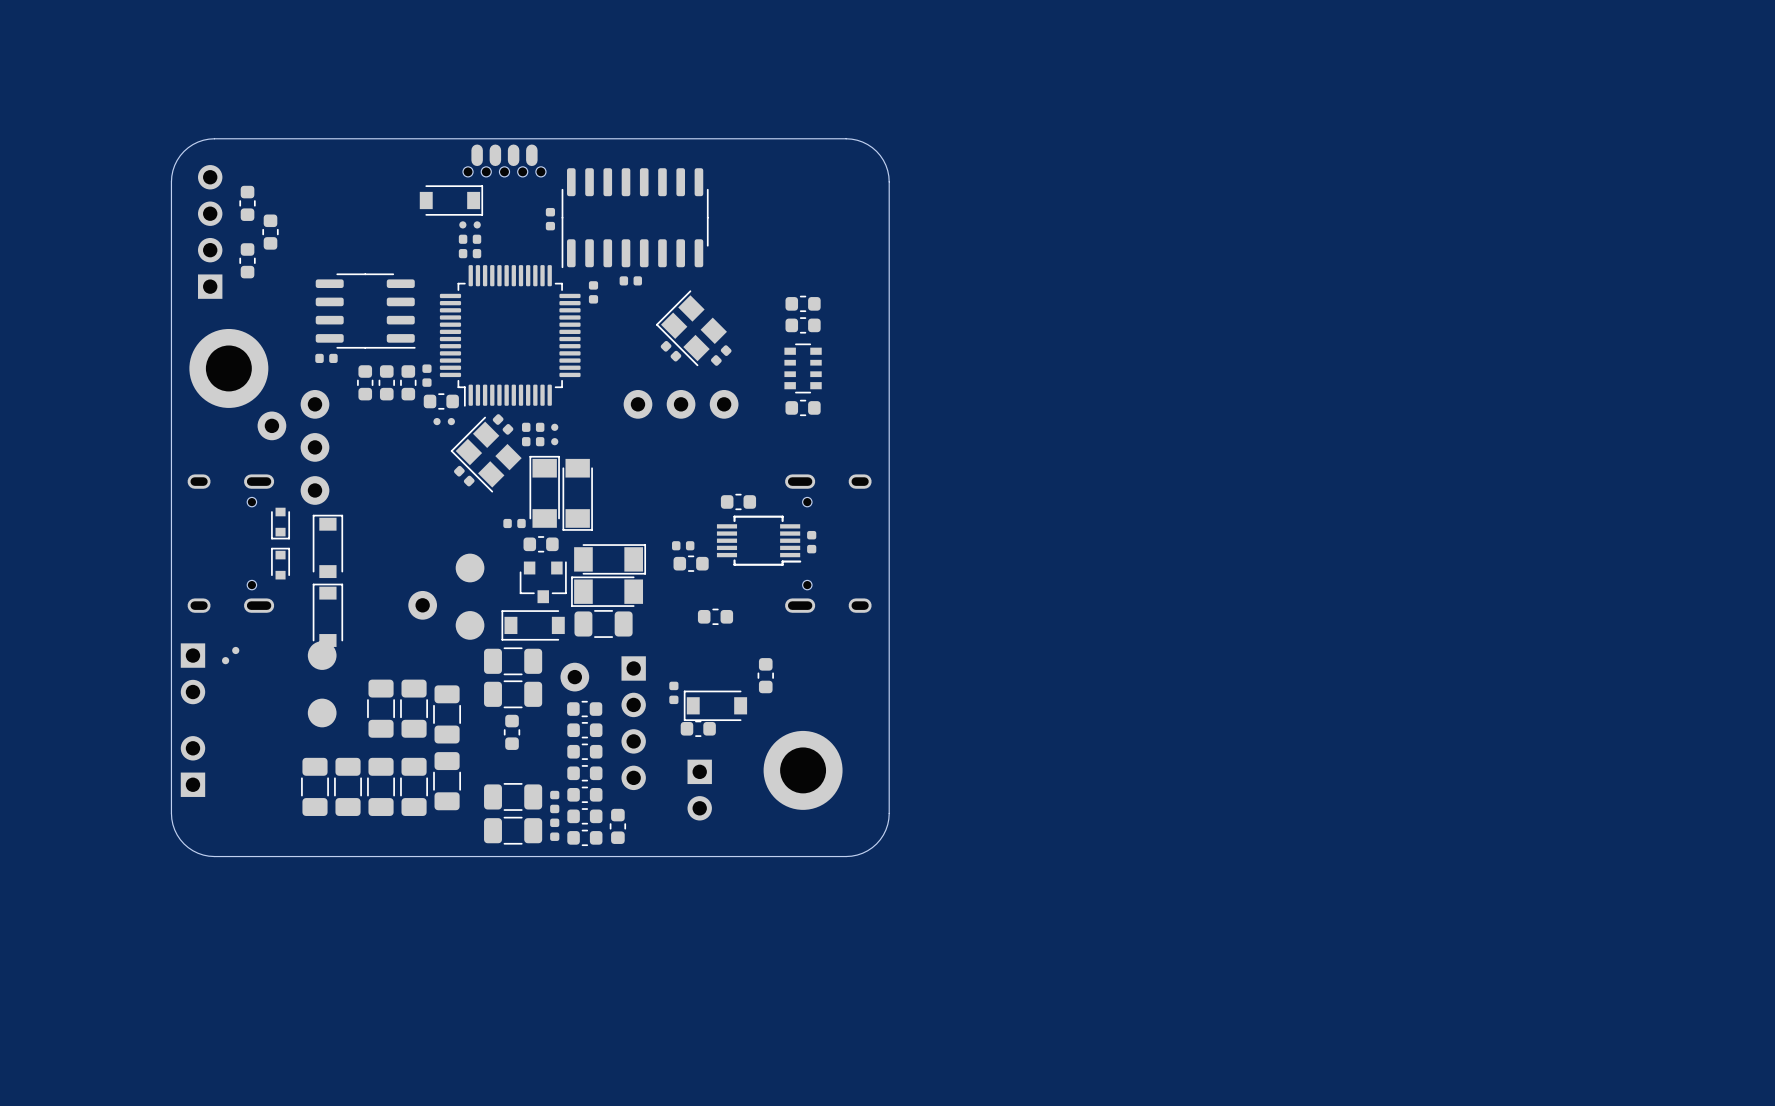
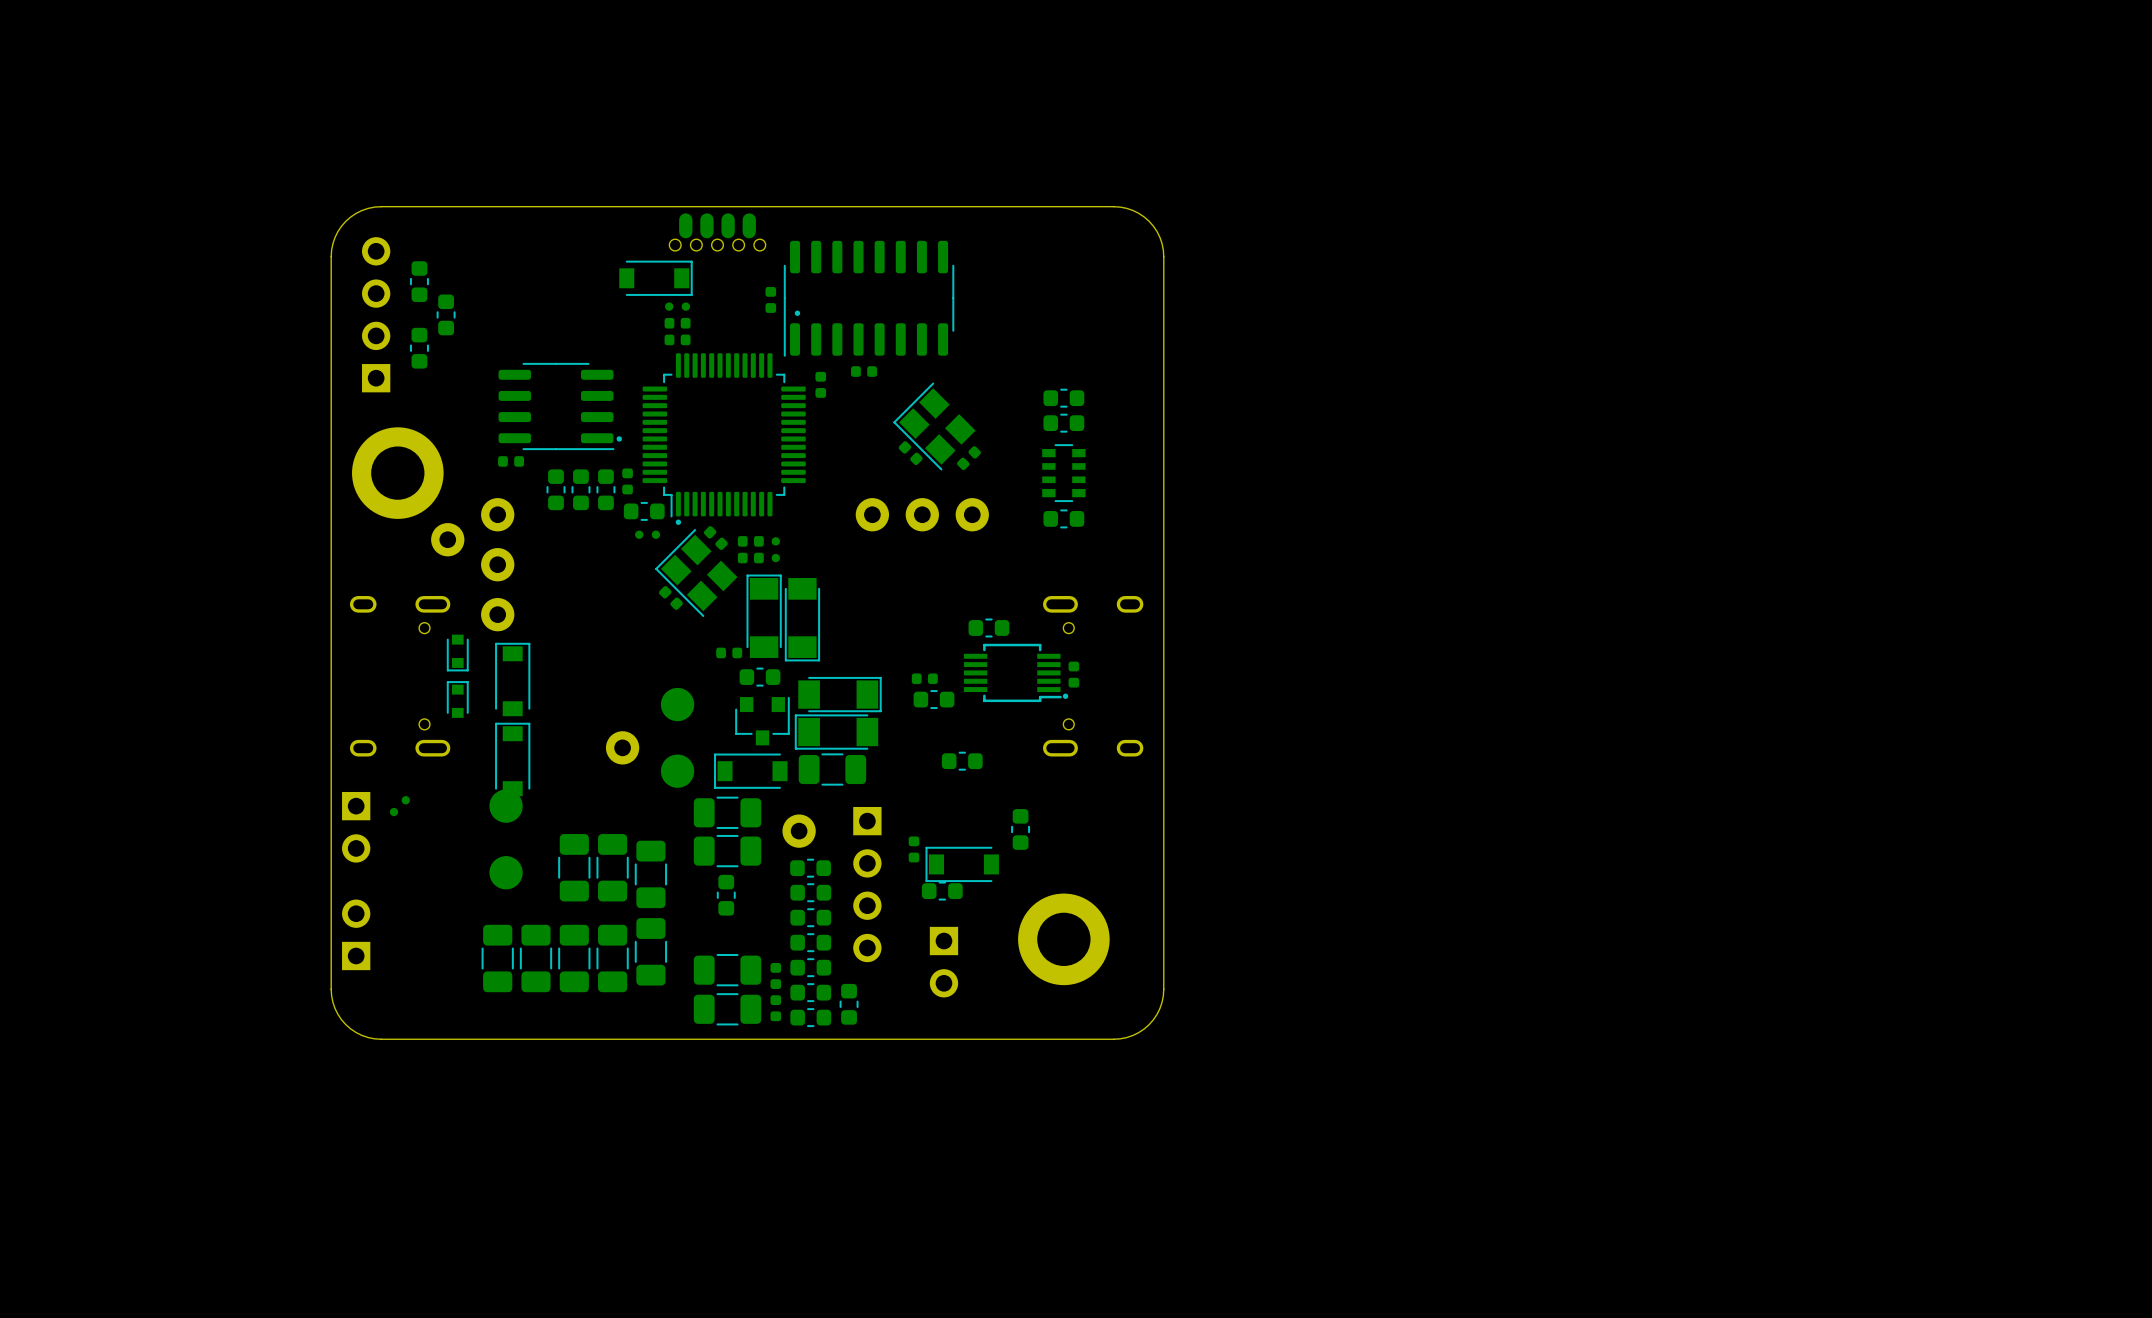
drawing: none -> [794, 310, 801, 316]
drawing: none -> [616, 436, 622, 442]
drawing: none -> [675, 519, 682, 525]
drawing: none -> [1062, 693, 1069, 699]

